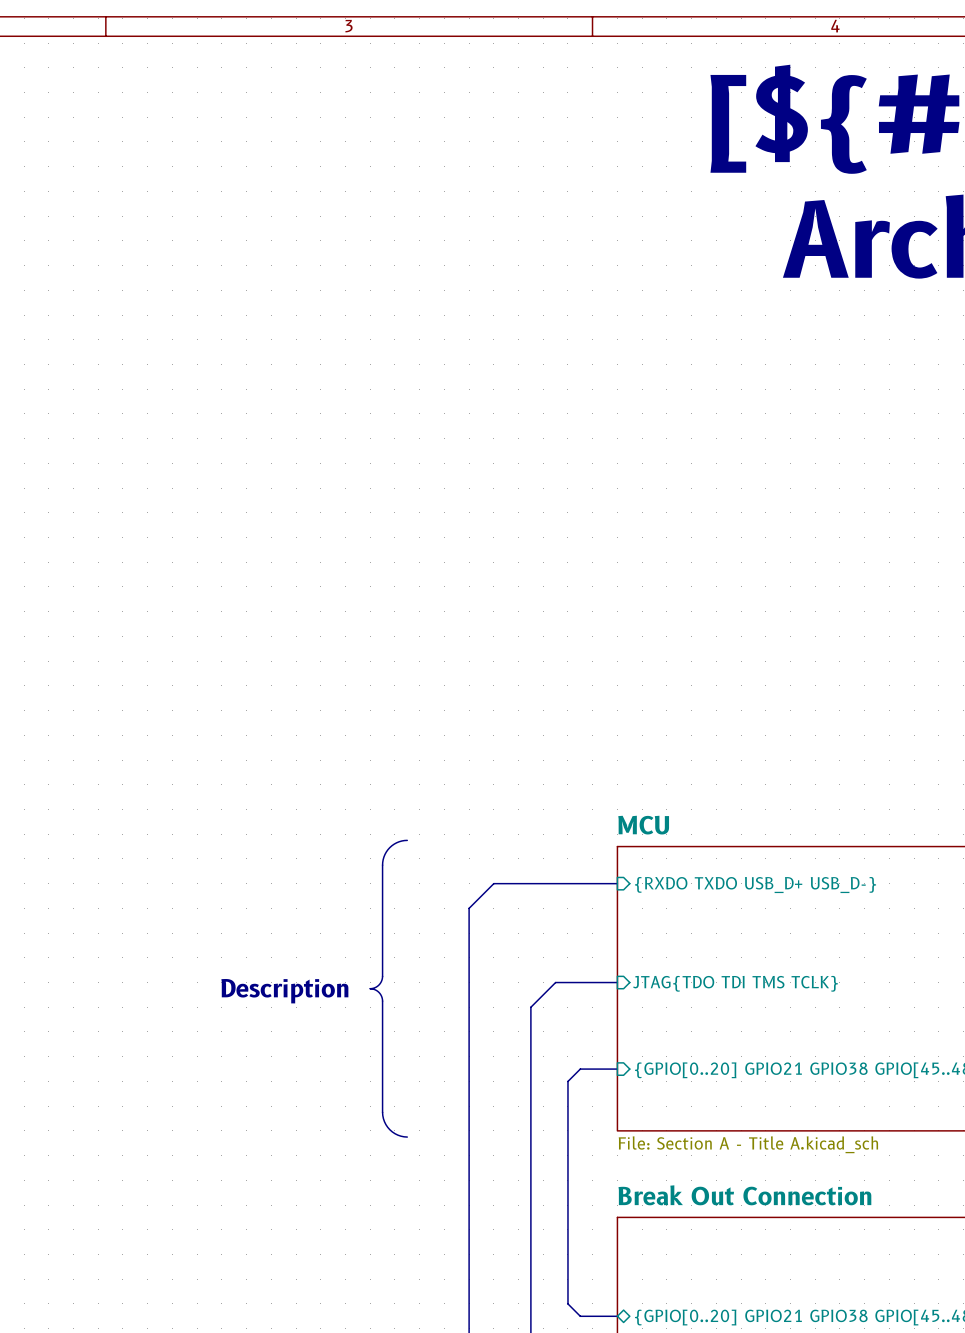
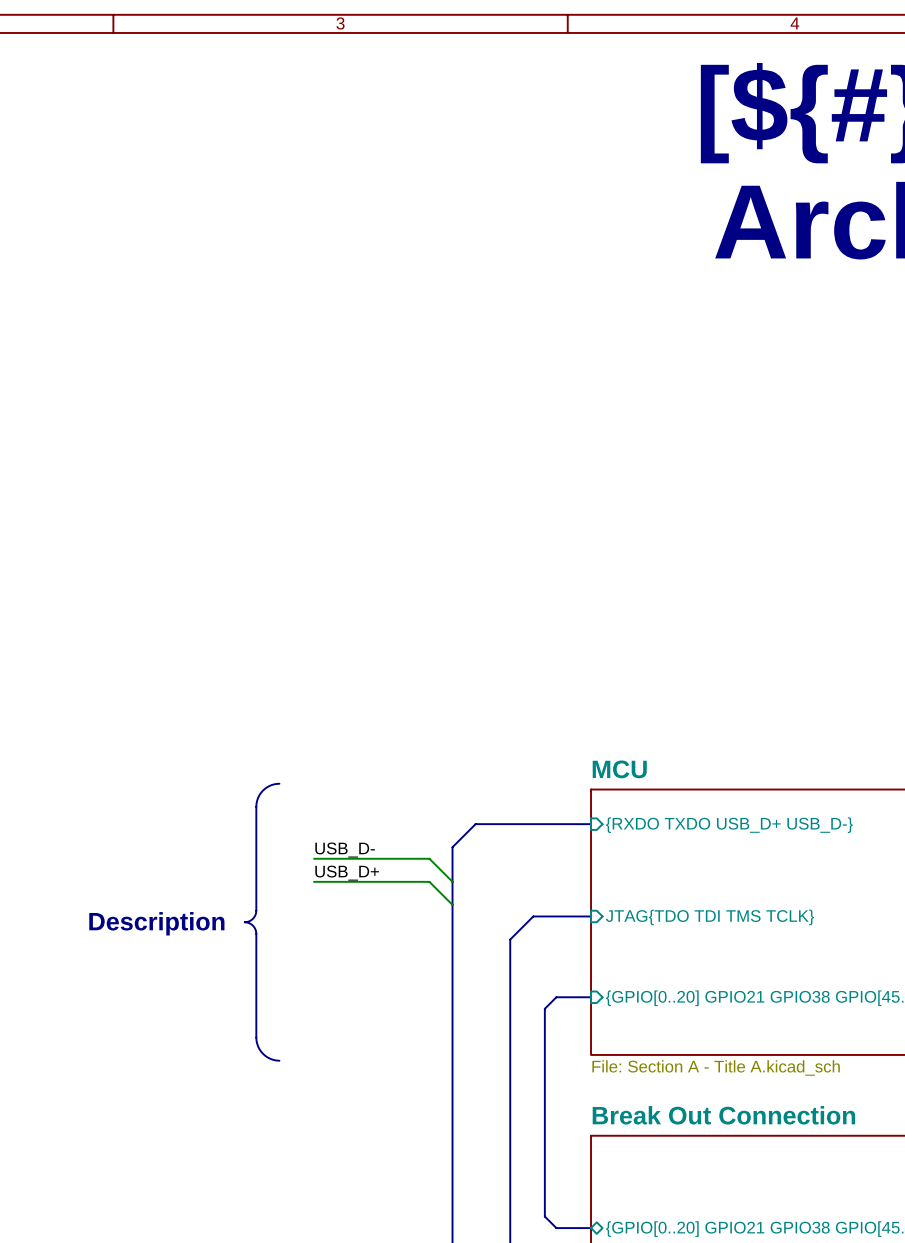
line: (407, 840) (391, 845) (383, 859) (382, 977) (378, 985) (370, 988) (378, 992) (382, 999) (383, 1118) (392, 1131) (407, 1137) -> (279, 783) (265, 788) (256, 801) (256, 912) (252, 918) (244, 922) (251, 924) (256, 932) (257, 1043) (265, 1055) (279, 1060)
label: none -> USB_D- (345, 850)
wire: none -> (314, 858) (429, 858) (452, 881)
label: none -> USB_D+ (347, 873)
wire: none -> (314, 881) (429, 881) (452, 904)
text position: Description (284, 991) -> Description (156, 923)

